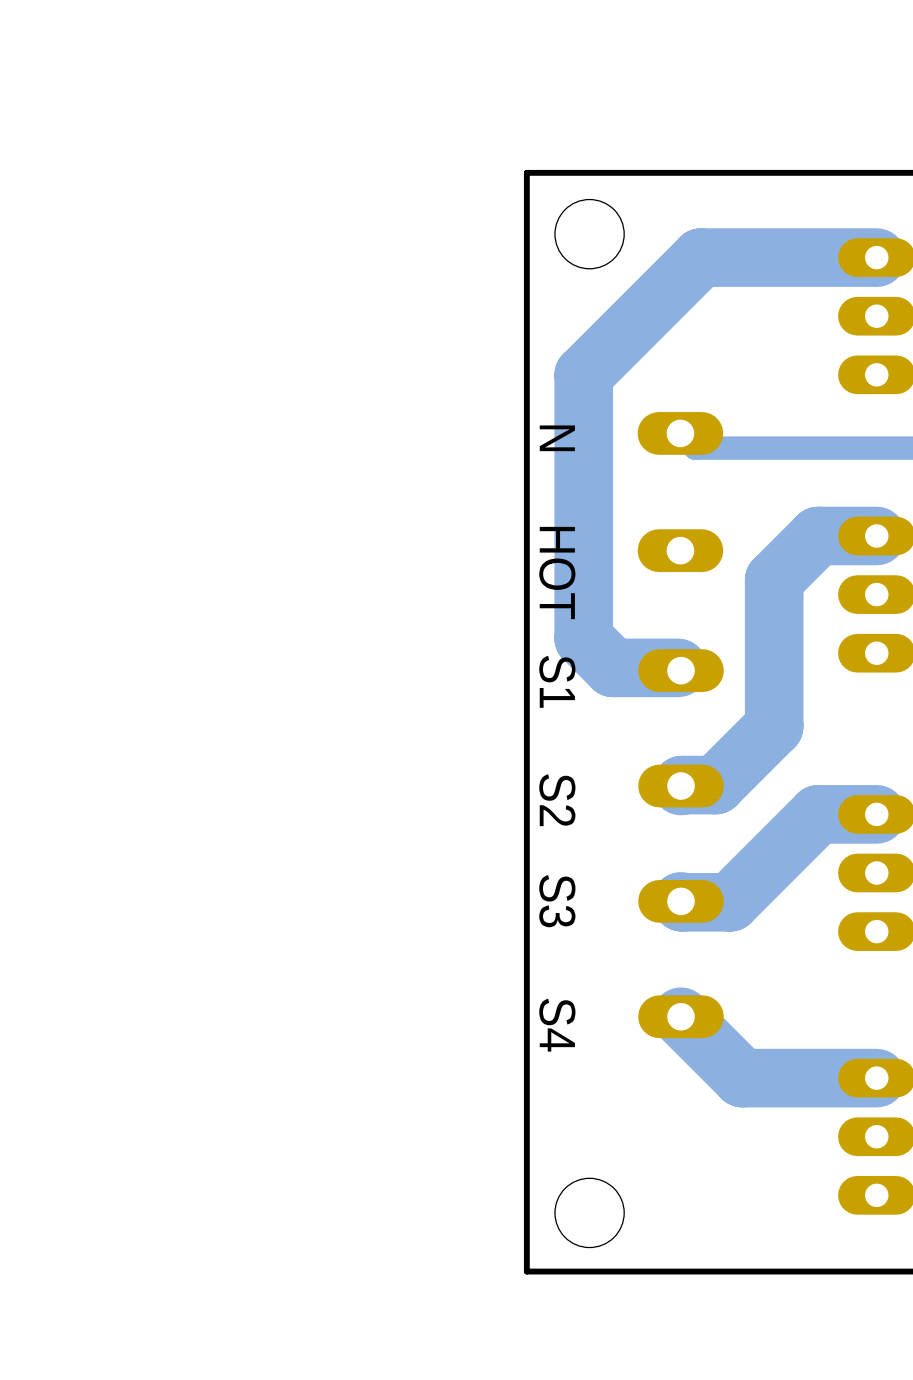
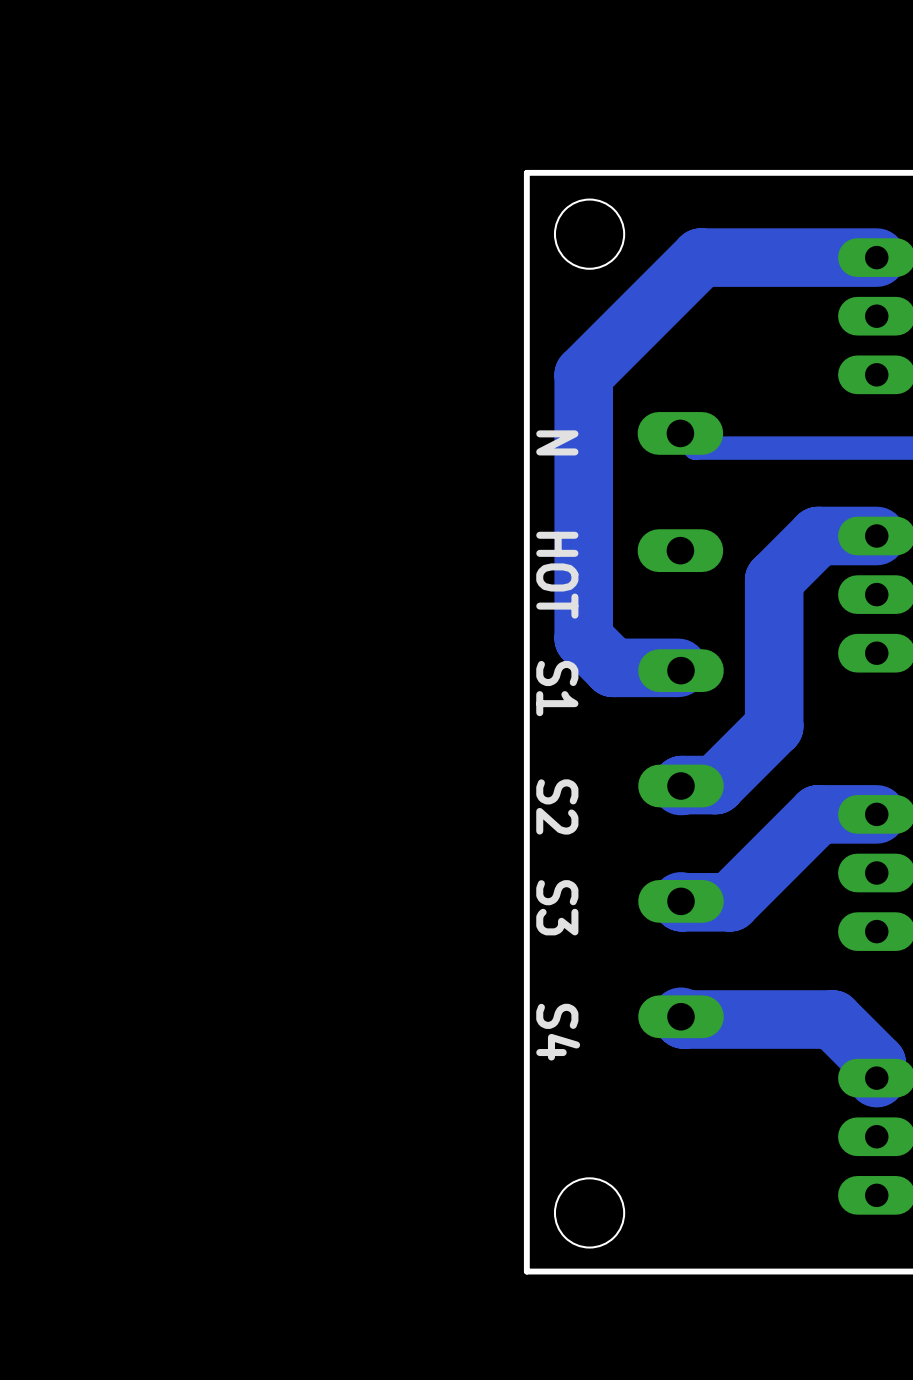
track: (681, 1016) (742, 1078) (876, 1078) -> (683, 1019) (832, 1019) (876, 1063) (876, 1078)

